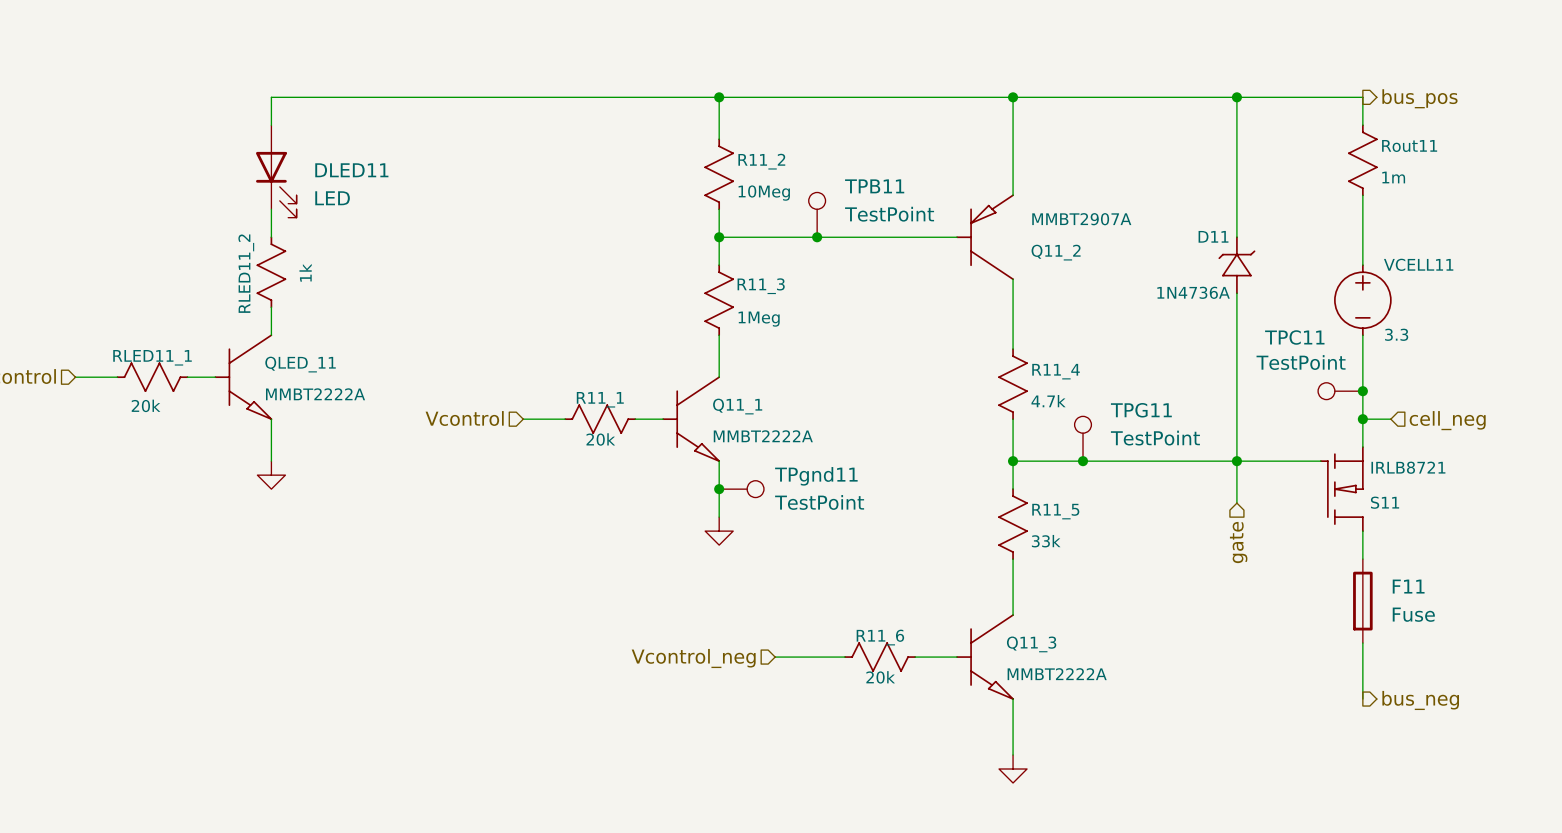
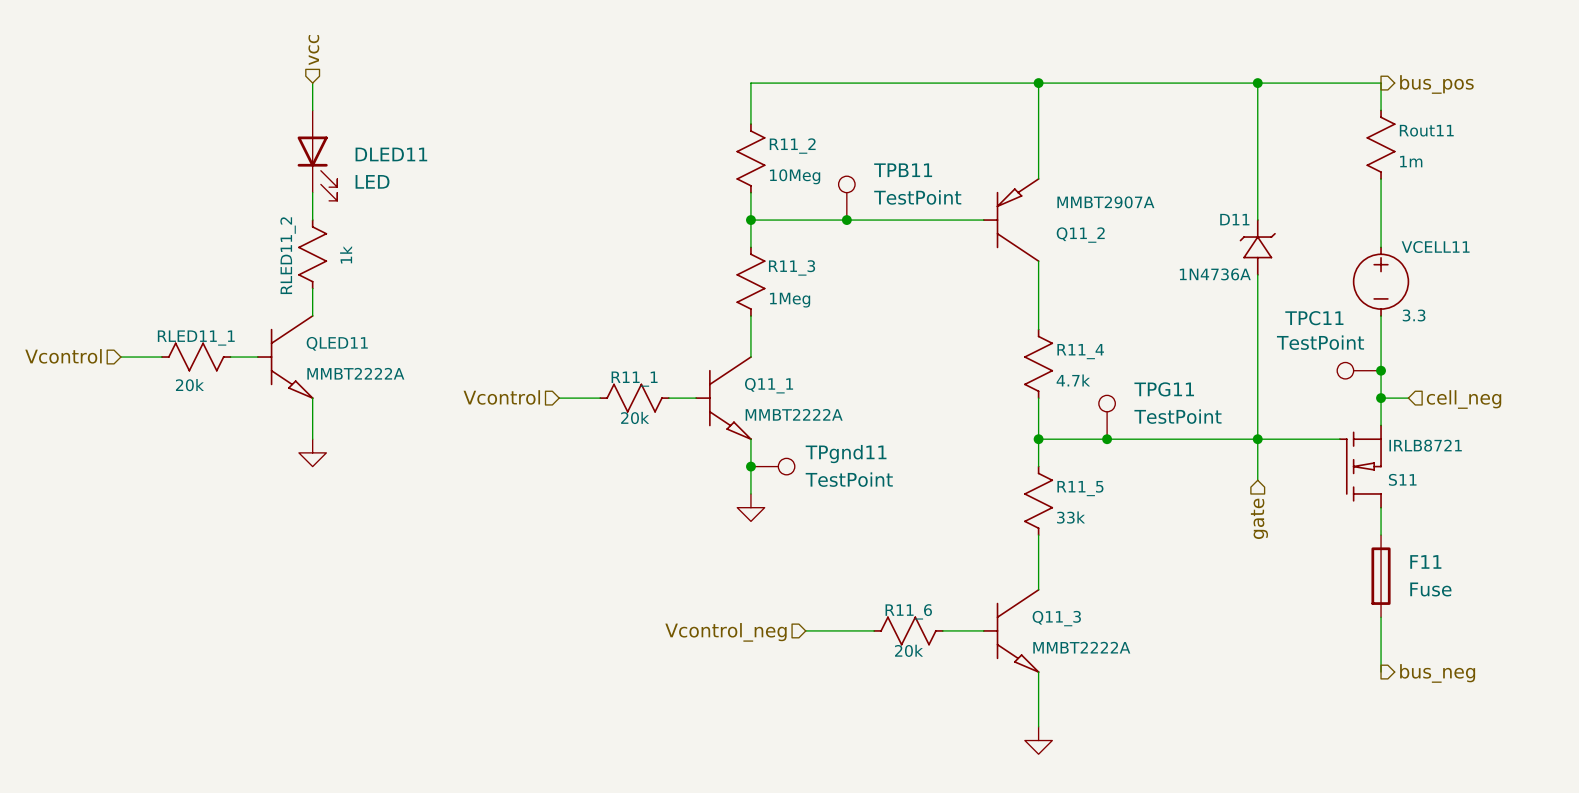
hierarchical label: none -> vcc (313, 50)
wire: (271, 97) (719, 97) -> none
junction: (719, 97) -> none
QLED_11 name: QLED_11 (300, 364) -> QLED11 (337, 343)

